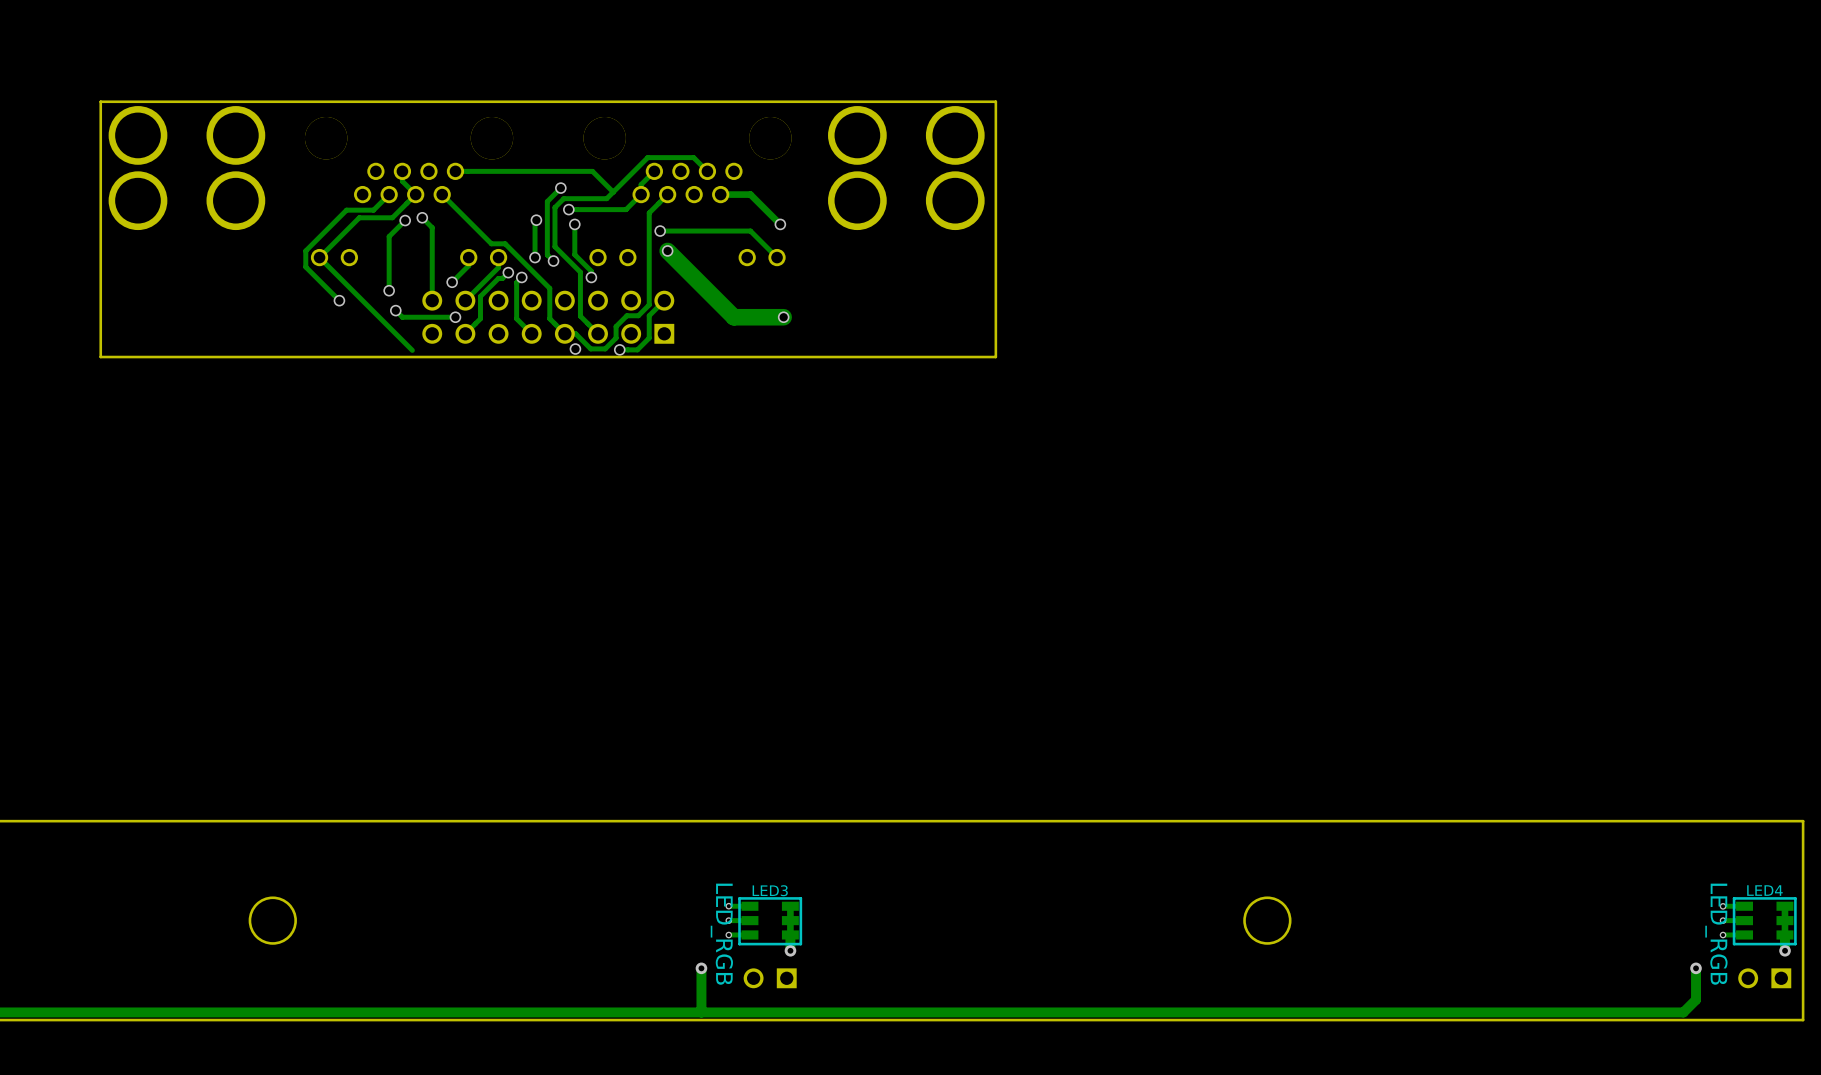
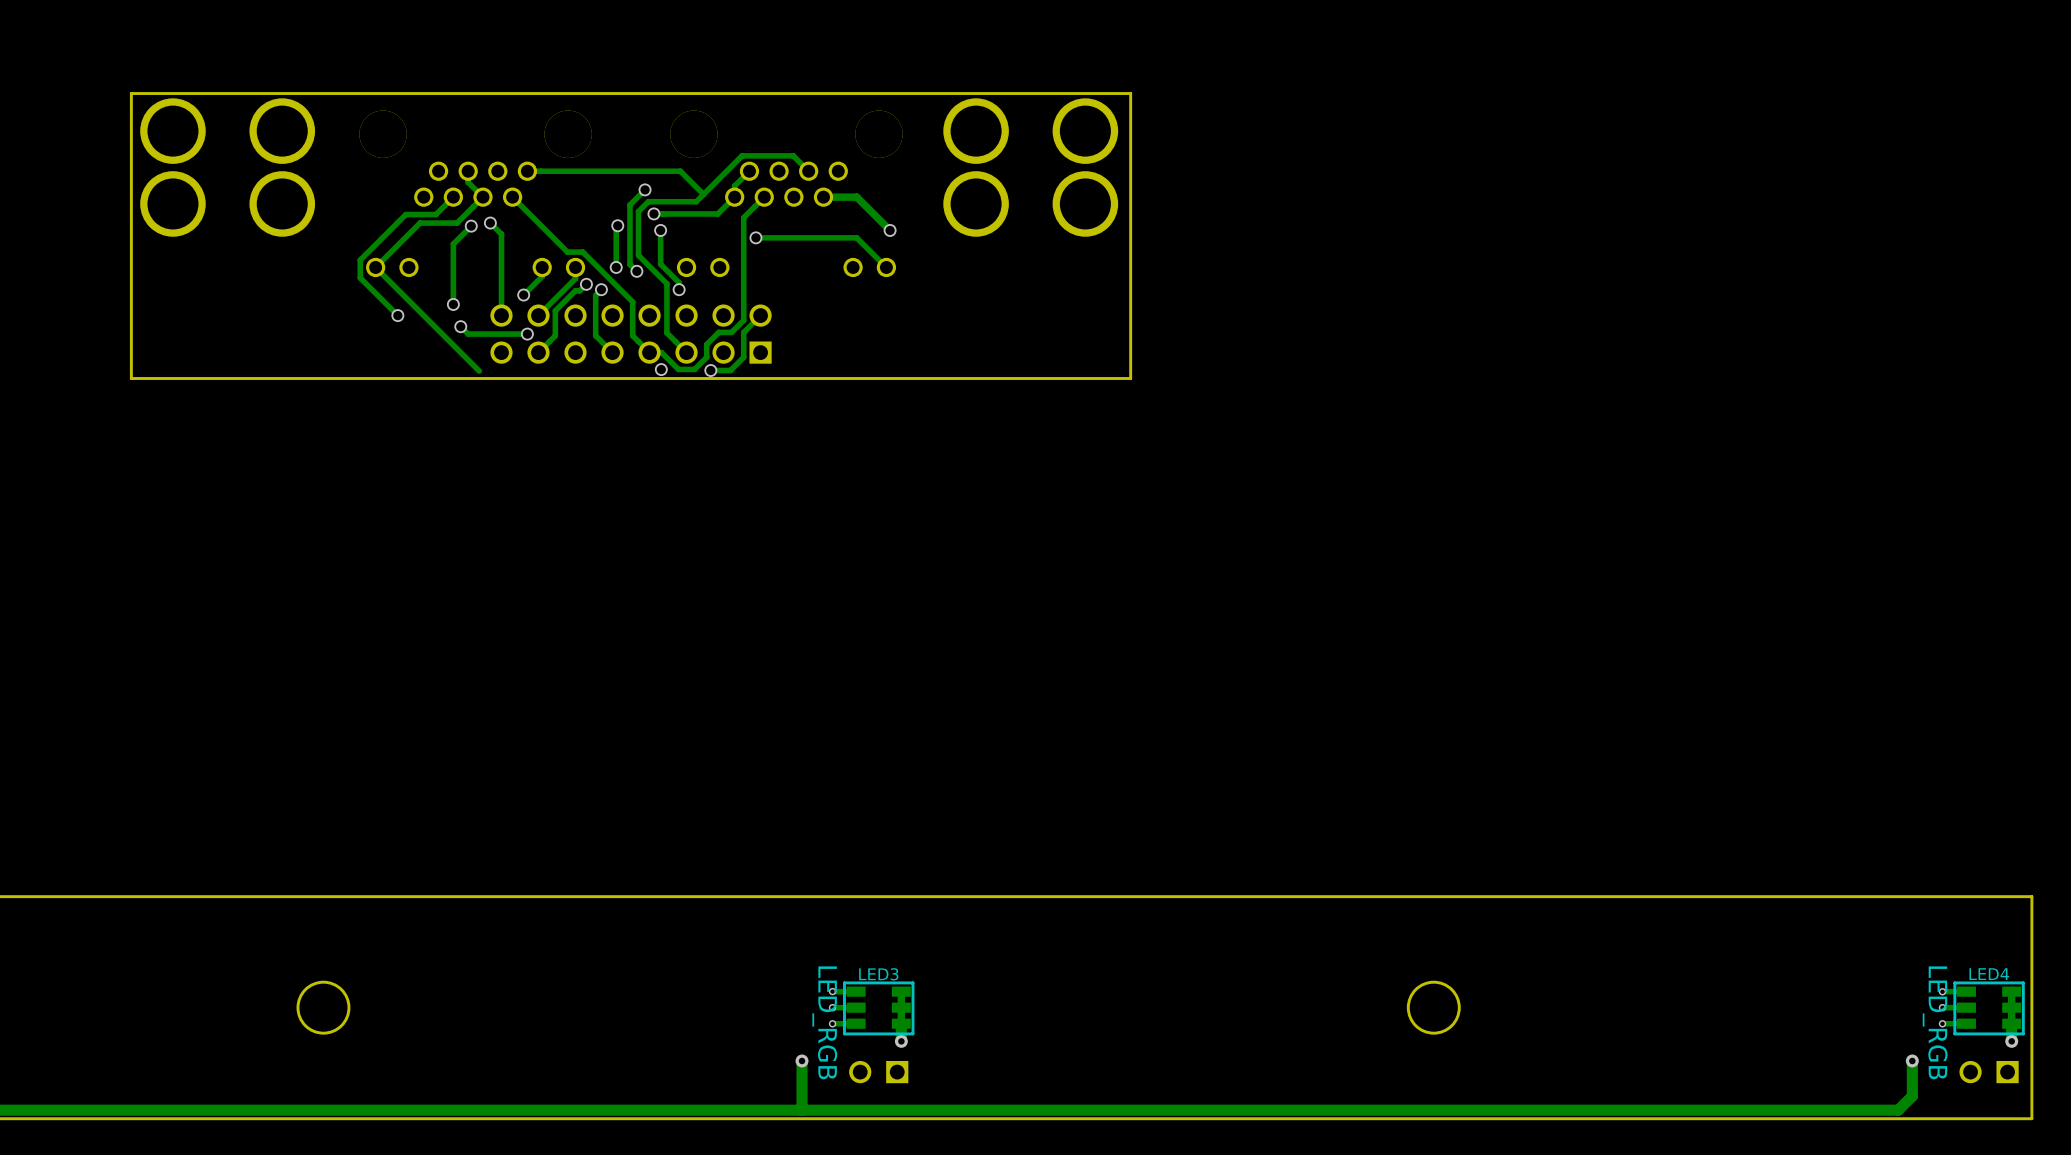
track: (667, 250) (733, 317) (783, 317) -> none
via: (667, 250) -> none
via: (783, 317) -> none

